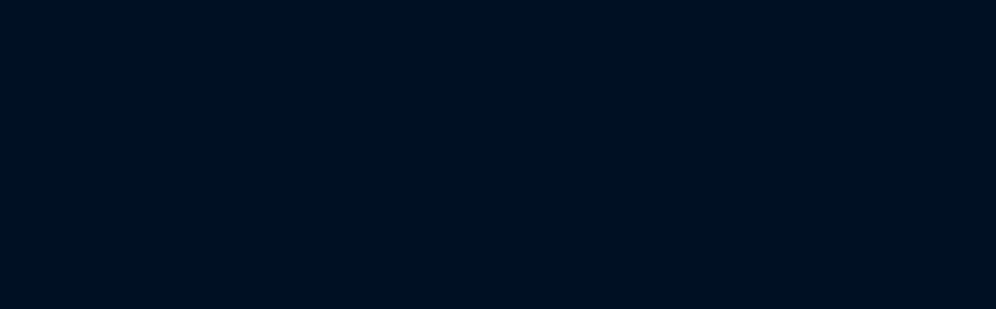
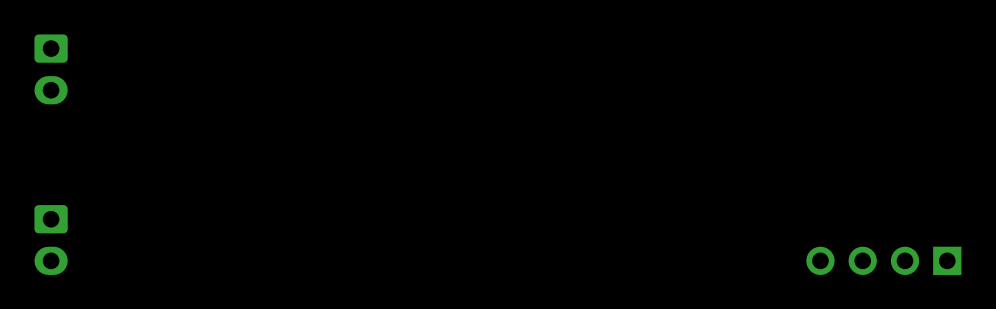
part: none -> (51, 69)
part: none -> (51, 240)
part: none -> (883, 260)

